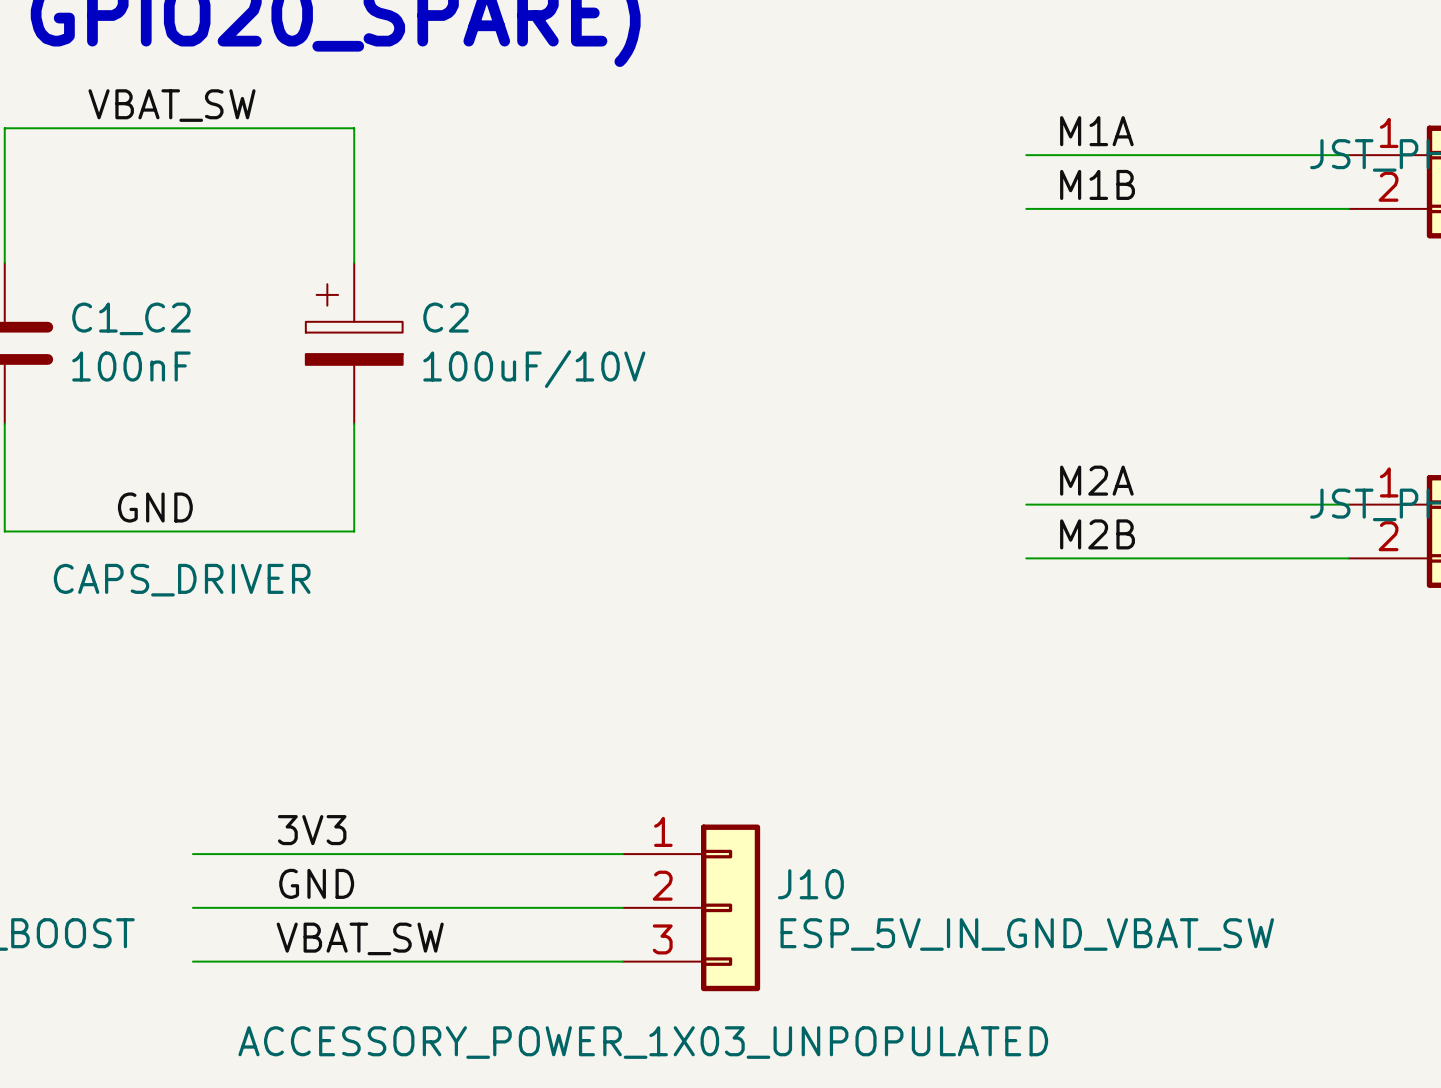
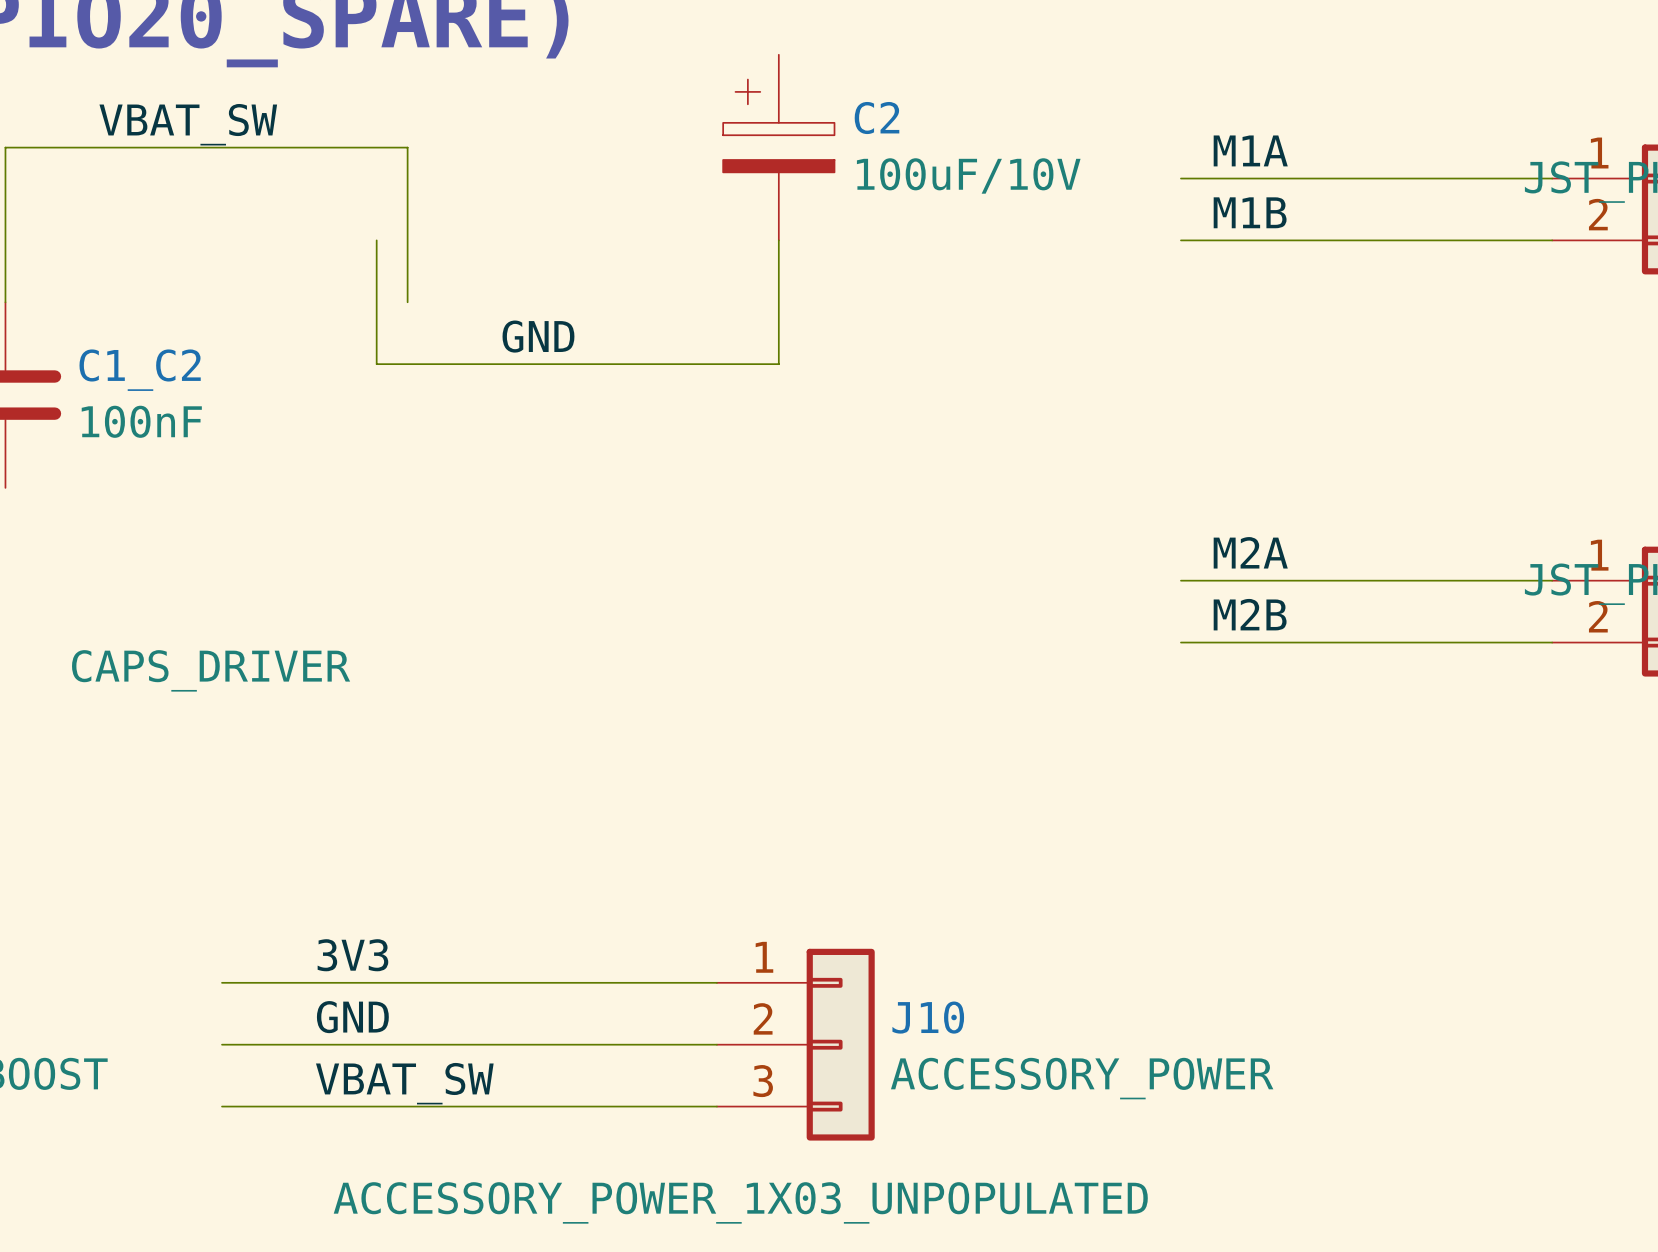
C2 position: (354, 343) -> (778, 147)
wire: (4, 423) (4, 531) (354, 531) (354, 423) -> (376, 240) (376, 364) (778, 364) (778, 240)
label position: GND (155, 507) -> GND (538, 336)
J10 value: ESP_5V_IN_GND_VBAT_SW (1027, 934) -> ACCESSORY_POWER (1082, 1078)

